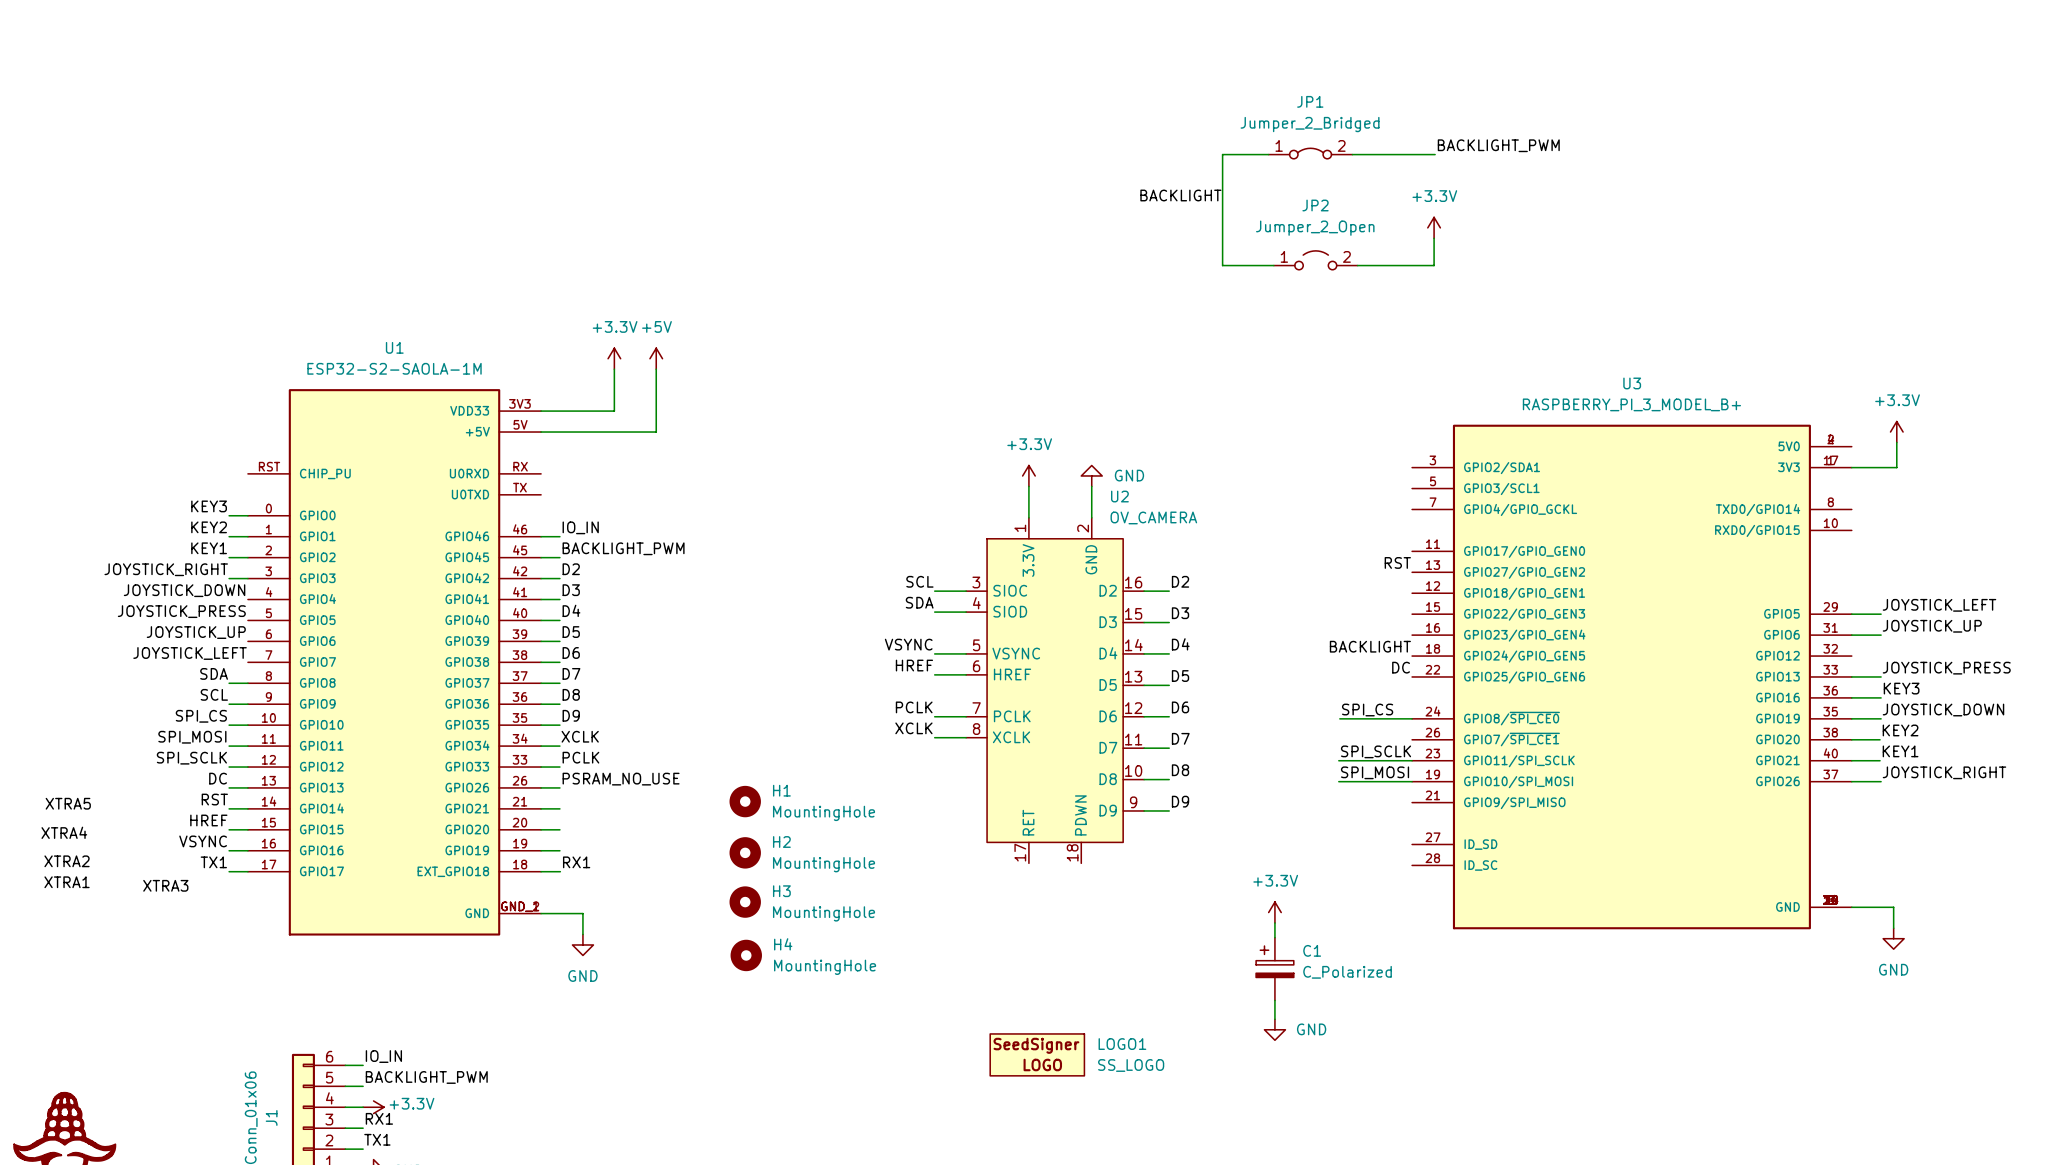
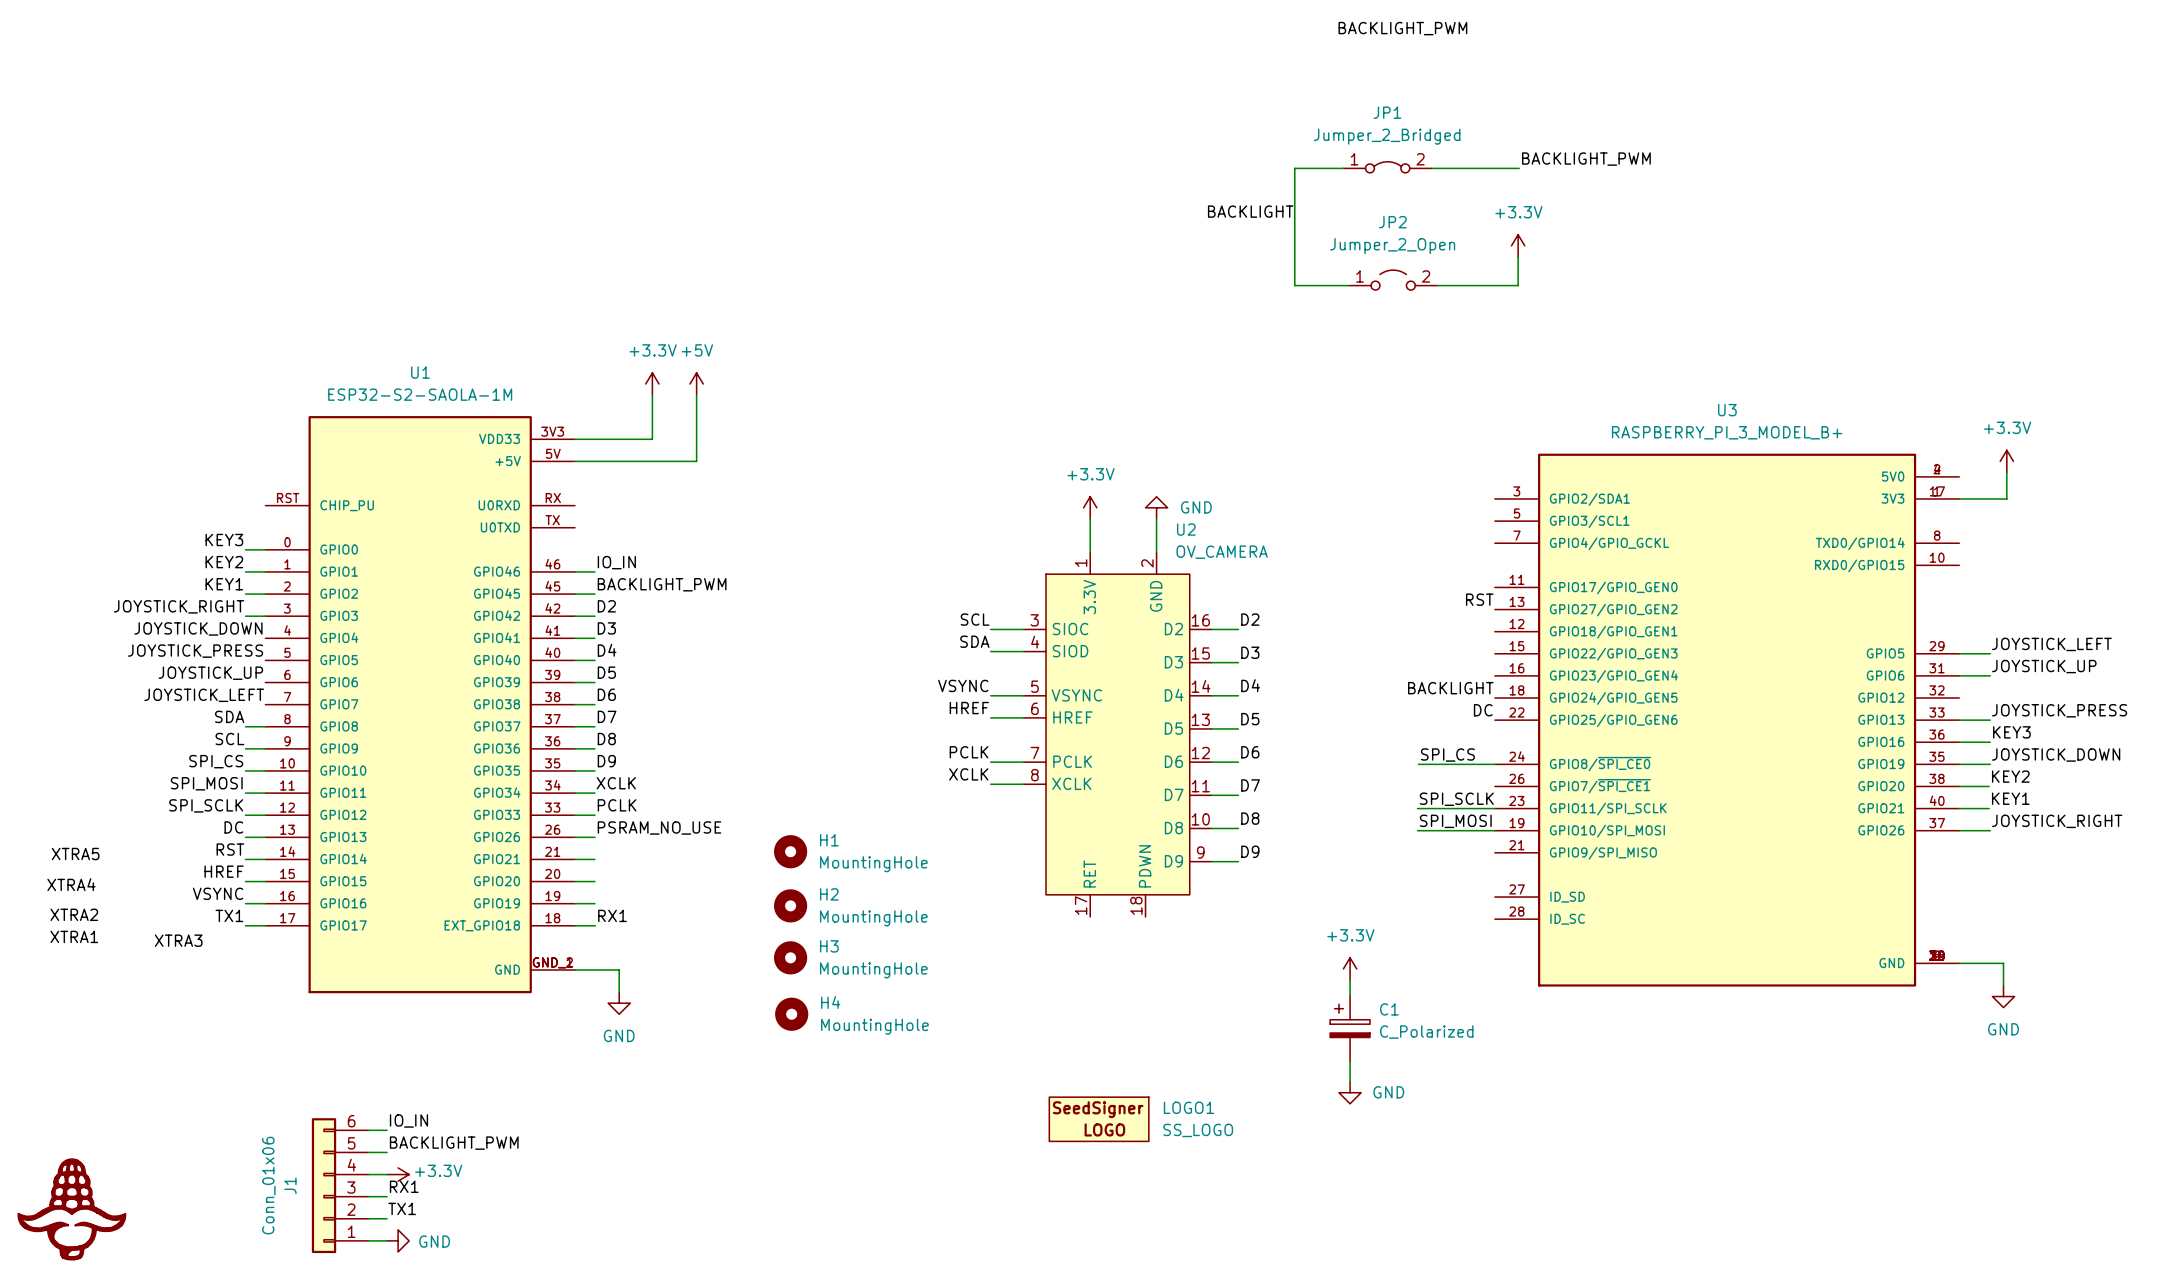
label: none -> BACKLIGHT_PWM (1402, 28)

